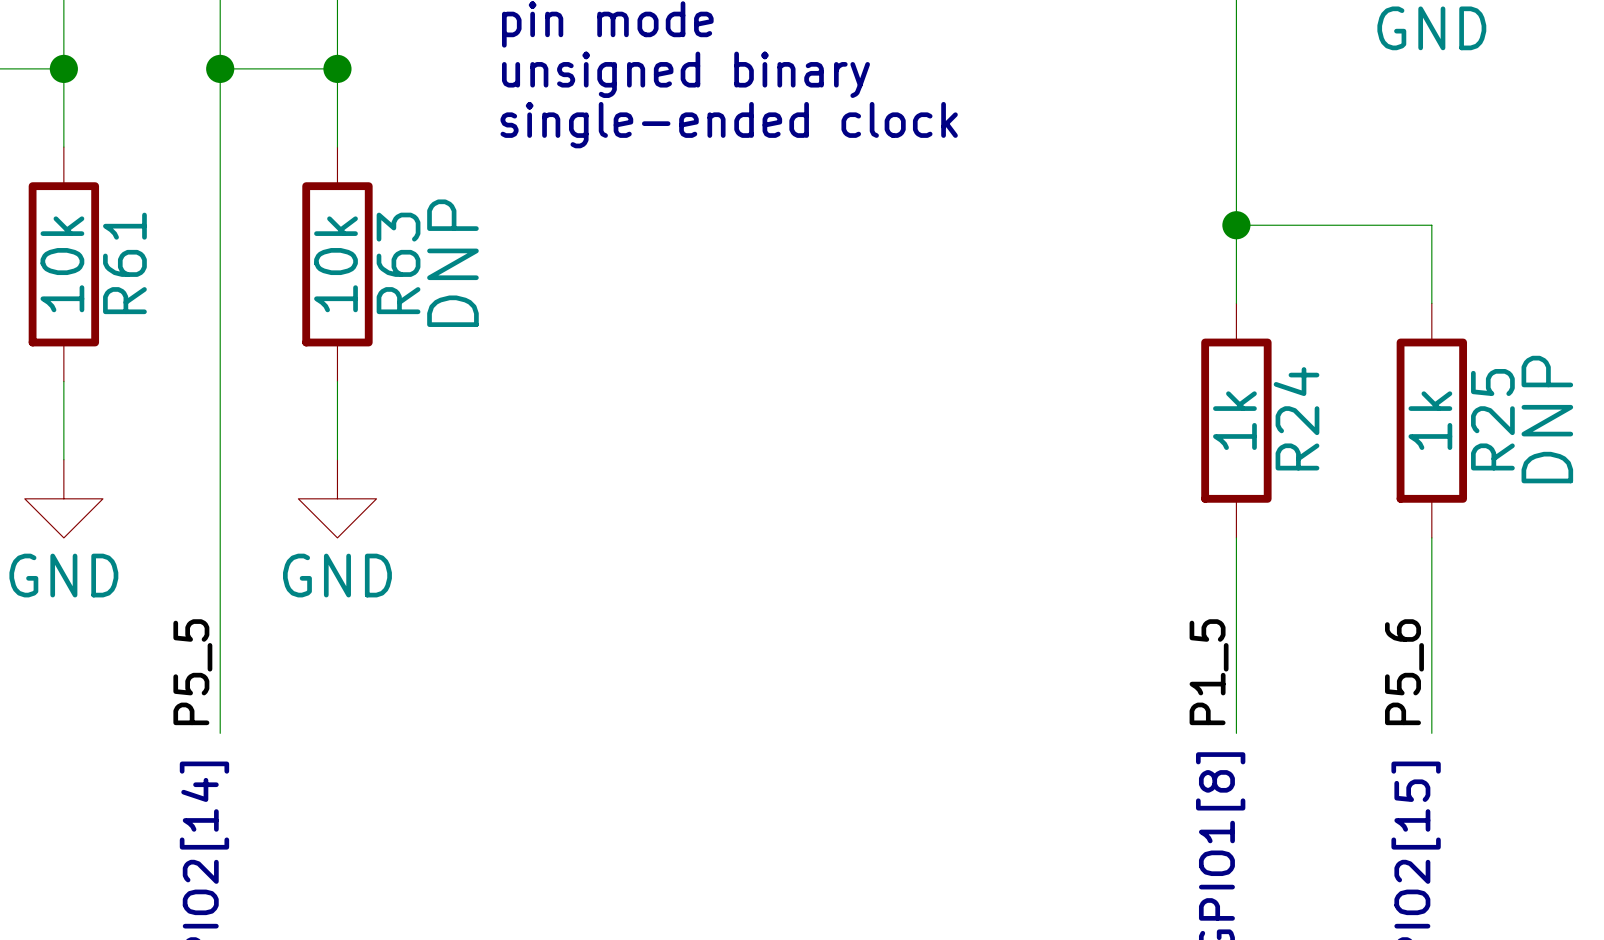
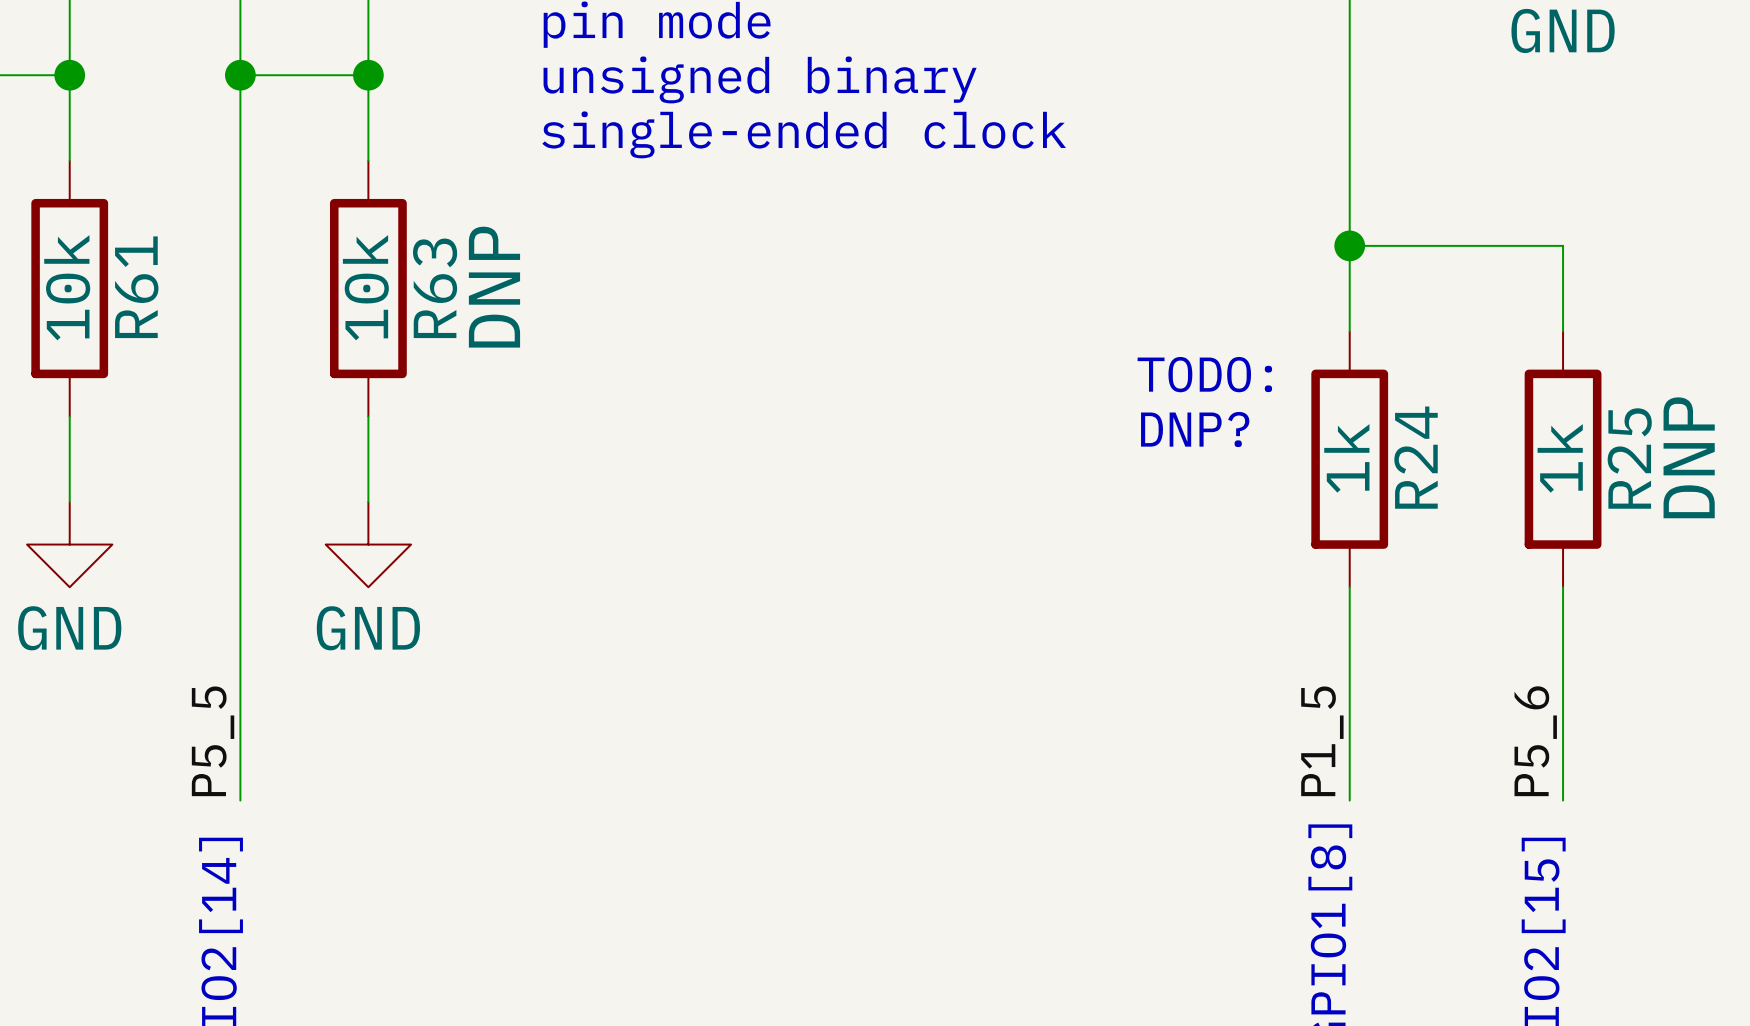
text: none -> TODO: (1204, 374)
text: none -> DNP? (1195, 429)

